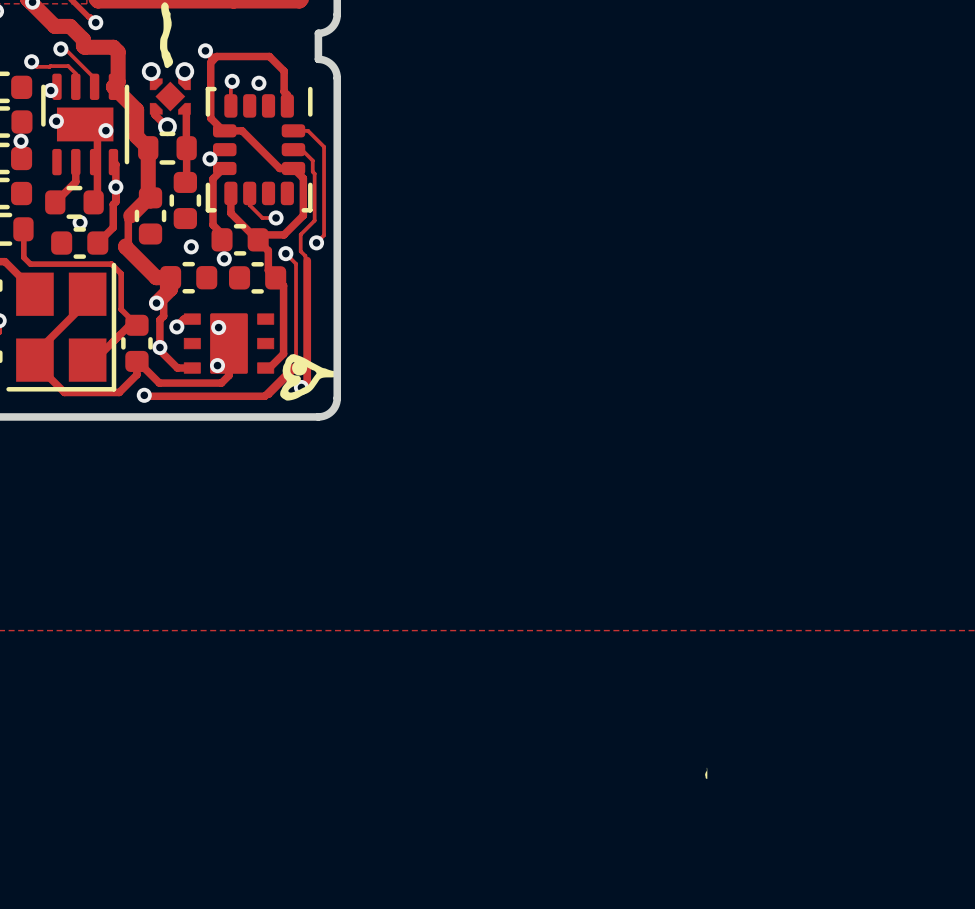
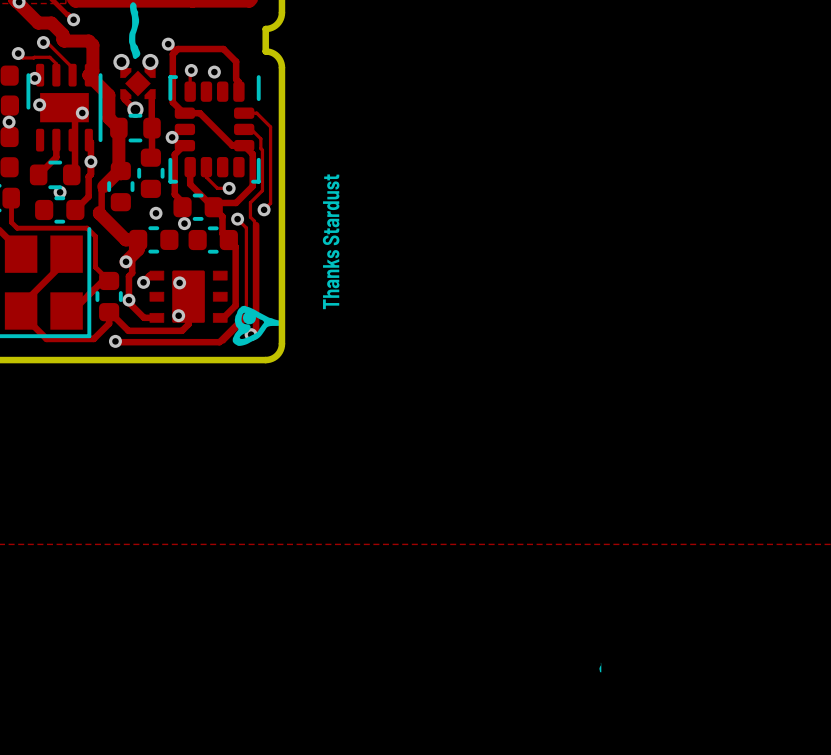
text: none -> Thanks Stardust (331, 241)

